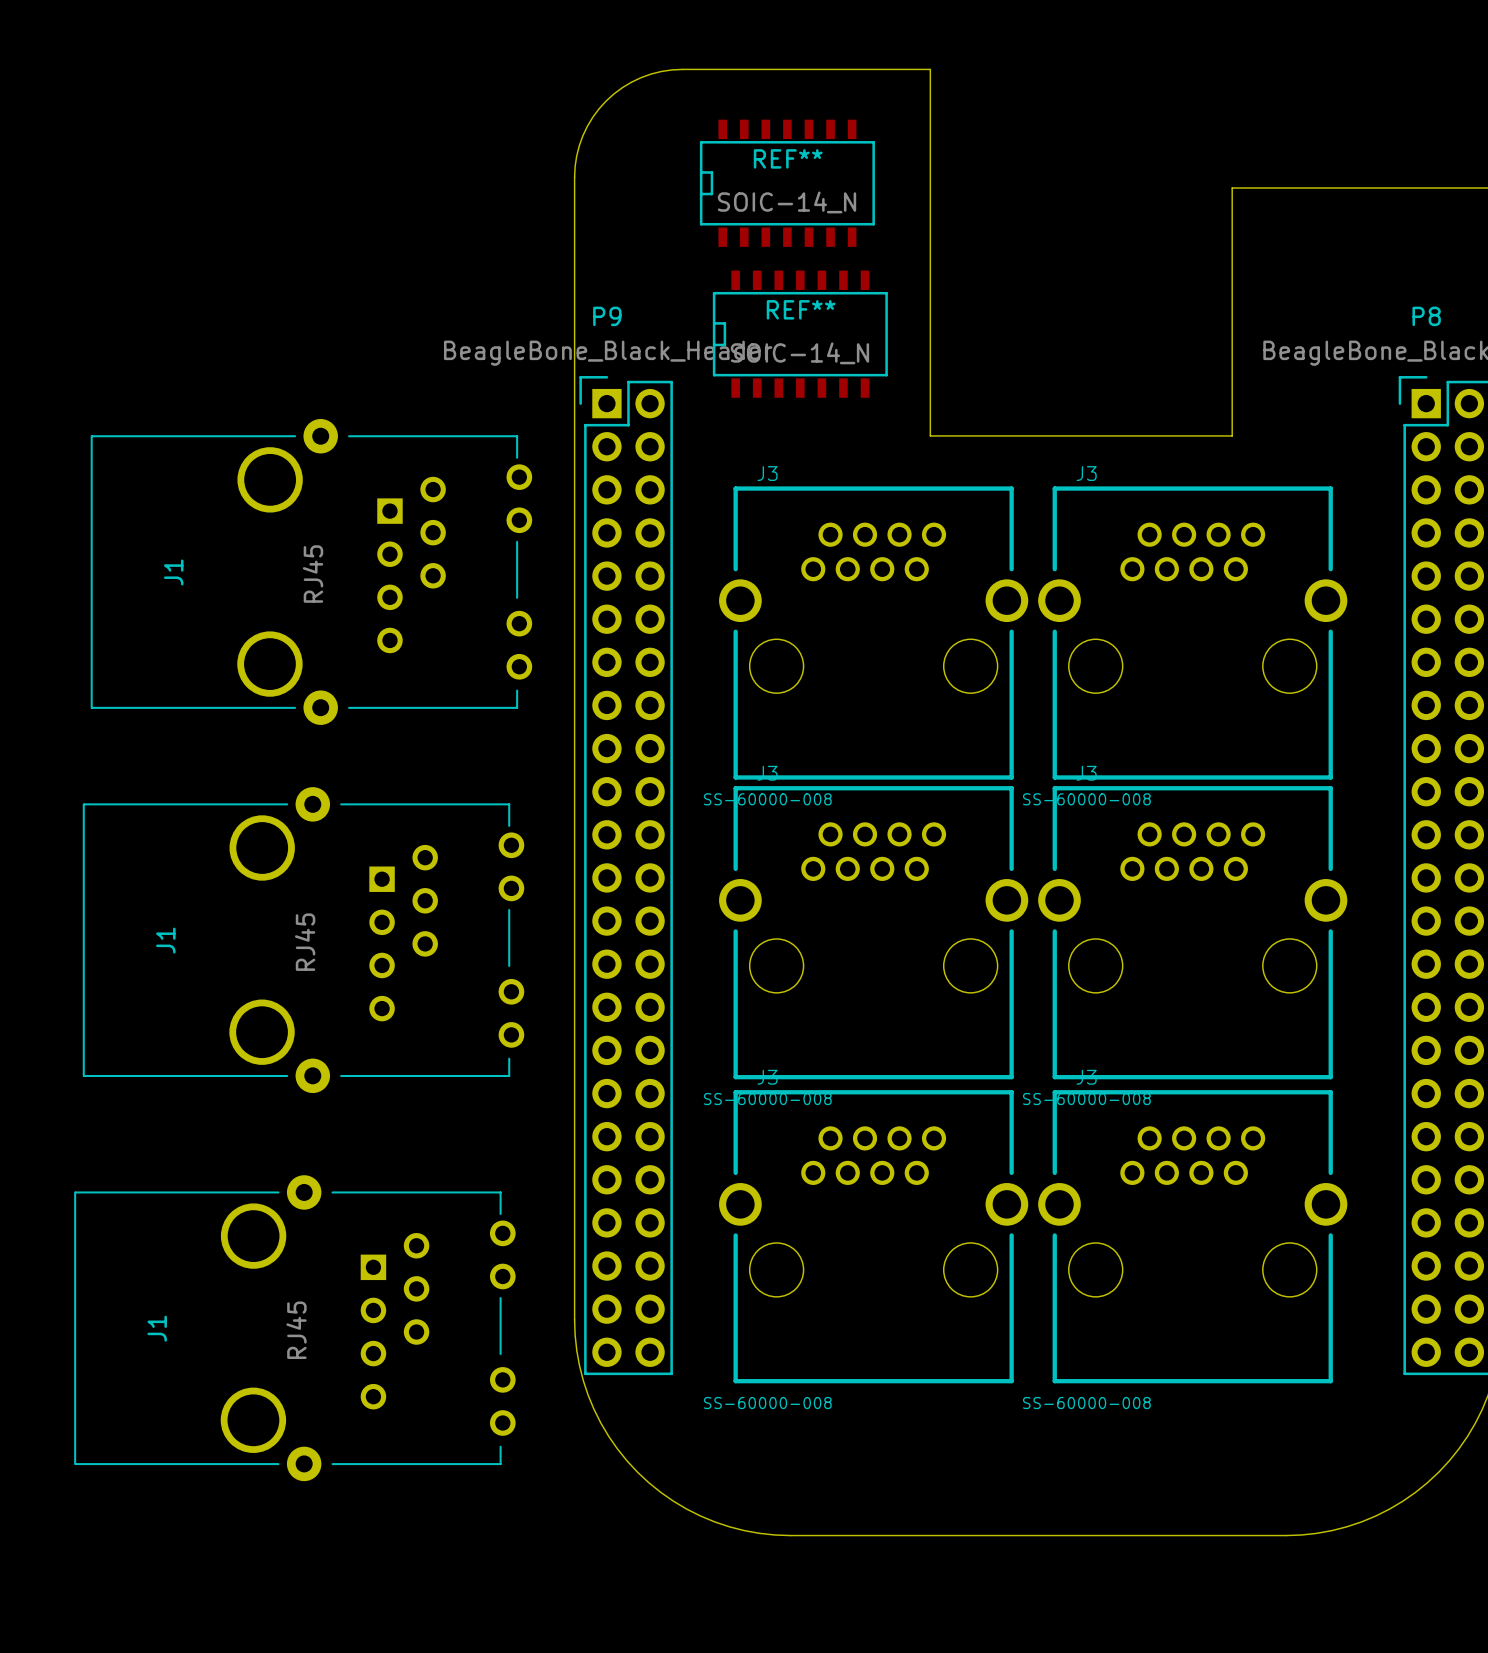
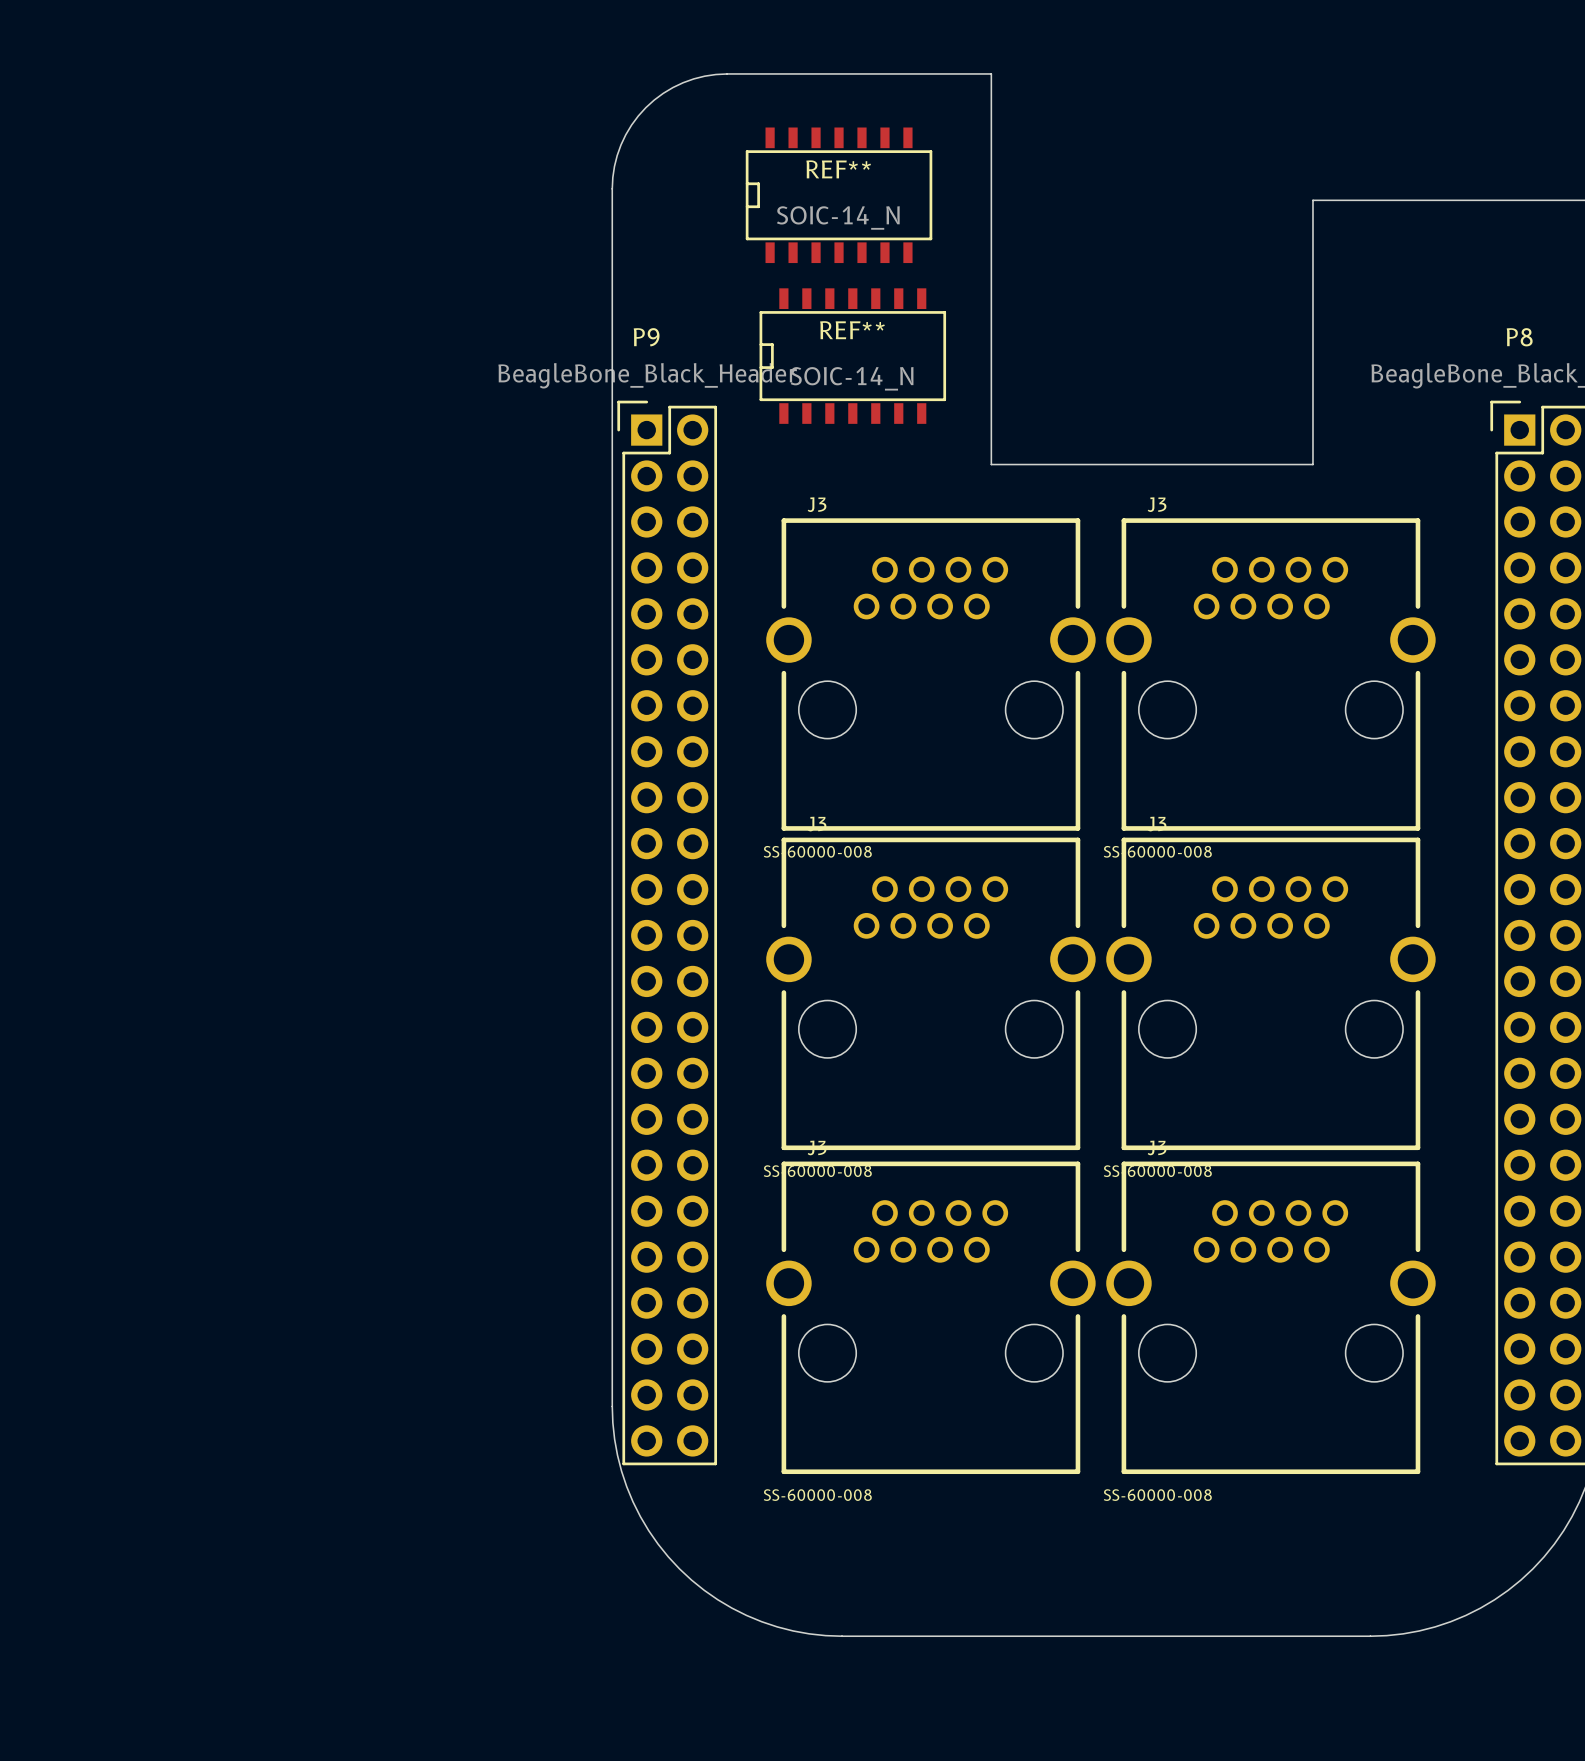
J1: RJ45 (311, 571) -> none
J1: RJ45 (303, 940) -> none
J1: RJ45 (294, 1328) -> none

